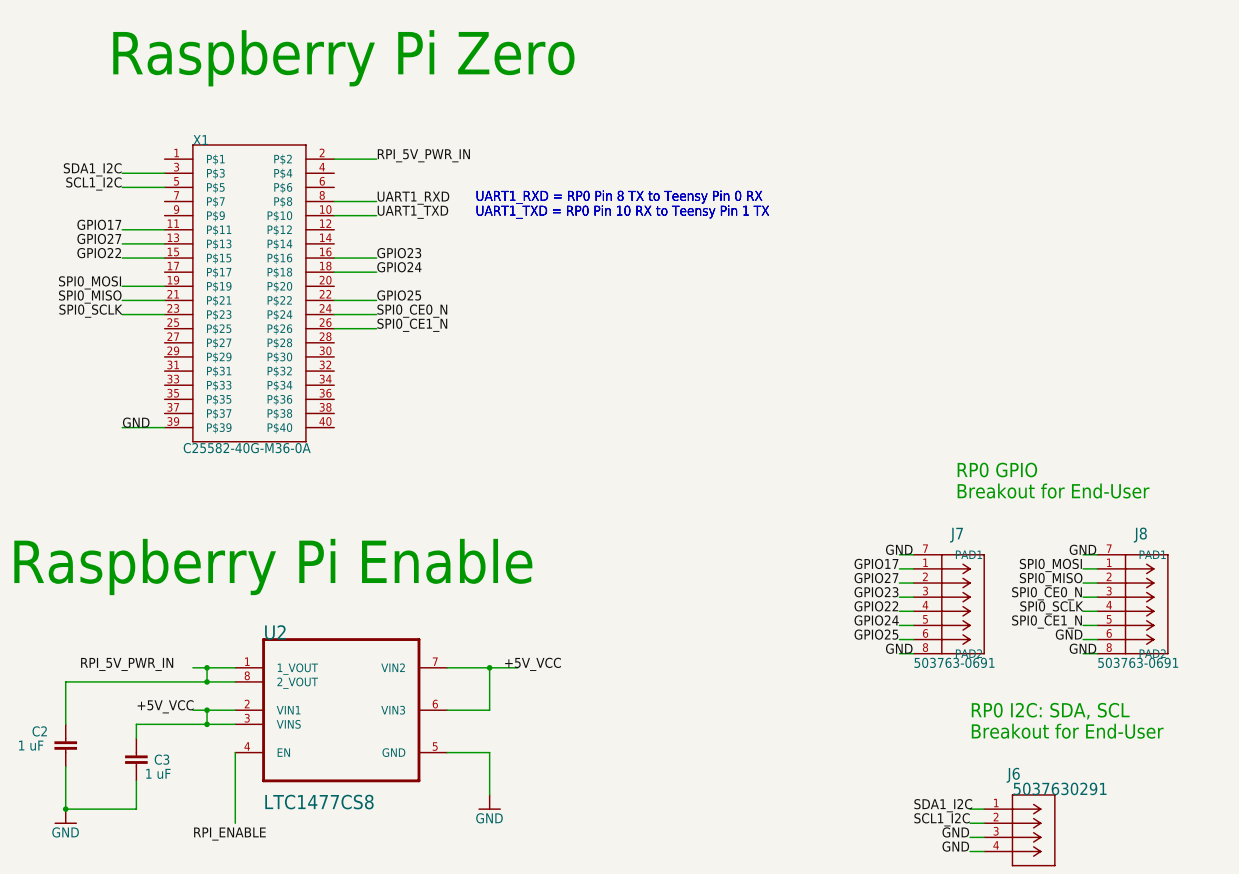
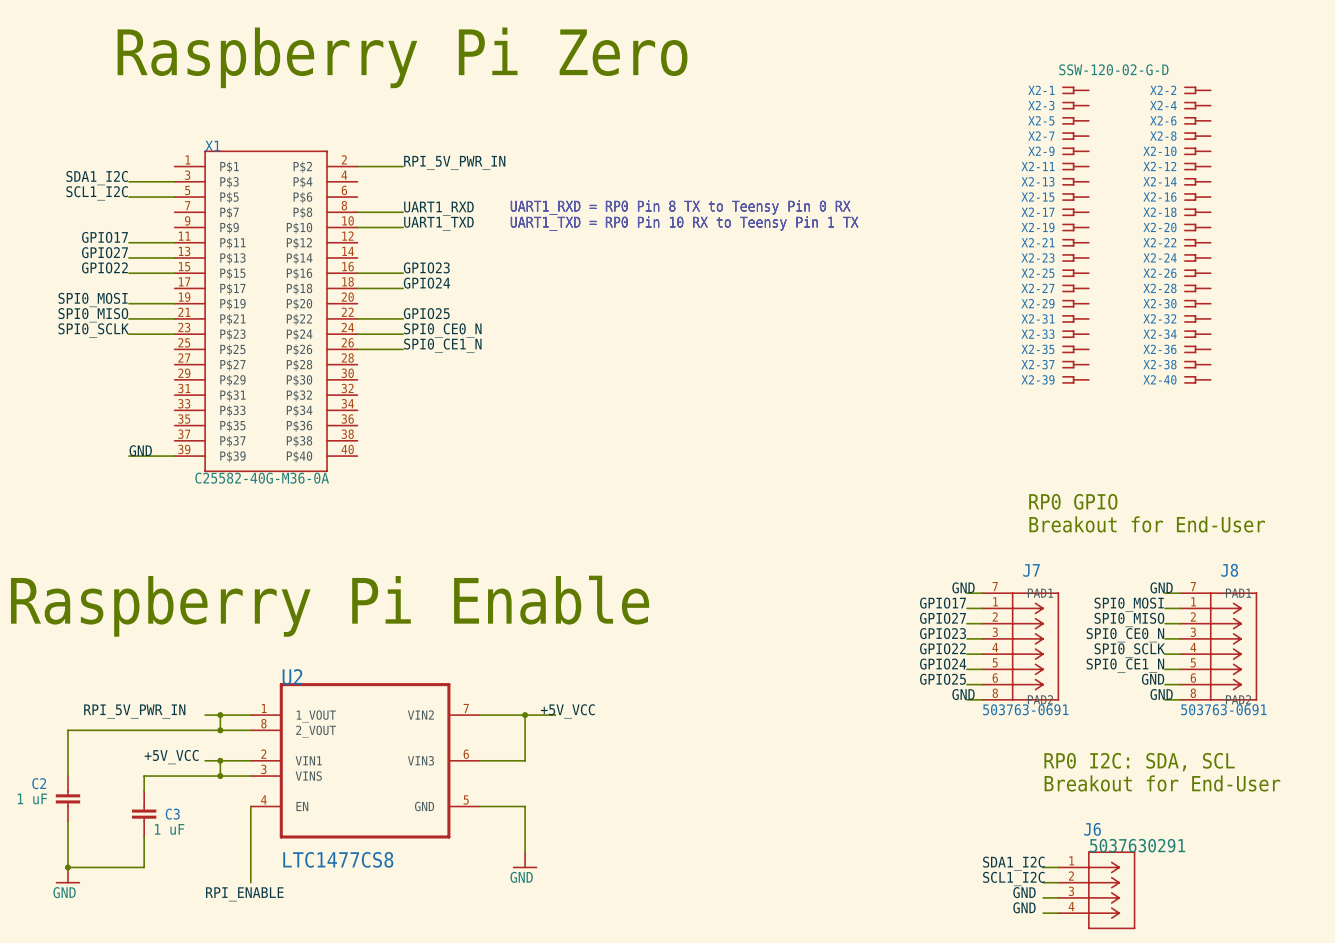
X2-1: none -> SSW-120-02-G-D (1075, 90)
X2-2: none -> (1197, 90)
X2-3: none -> (1075, 105)
X2-4: none -> (1197, 105)
X2-5: none -> (1075, 120)
X2-6: none -> (1197, 120)
X2-7: none -> (1075, 136)
X2-8: none -> (1197, 136)
X2-9: none -> (1075, 151)
X2-10: none -> (1197, 151)
X2-11: none -> (1075, 166)
X2-12: none -> (1197, 166)
X2-13: none -> (1075, 181)
X2-14: none -> (1197, 181)
X2-15: none -> (1075, 197)
X2-16: none -> (1197, 197)
X2-17: none -> (1075, 212)
X2-18: none -> (1197, 212)
X2-19: none -> (1075, 227)
X2-20: none -> (1197, 227)
X2-21: none -> (1075, 242)
X2-22: none -> (1197, 242)
X2-23: none -> (1075, 257)
X2-24: none -> (1197, 257)
X2-25: none -> (1075, 273)
X2-26: none -> (1197, 273)
X2-27: none -> (1075, 288)
X2-28: none -> (1197, 288)
X2-29: none -> (1075, 303)
X2-30: none -> (1197, 303)
X2-31: none -> (1075, 318)
X2-32: none -> (1197, 318)
X2-33: none -> (1075, 334)
X2-34: none -> (1197, 334)
X2-35: none -> (1075, 349)
X2-36: none -> (1197, 349)
X2-37: none -> (1075, 364)
X2-38: none -> (1197, 364)
X2-39: none -> (1075, 379)
X2-40: none -> (1197, 379)

